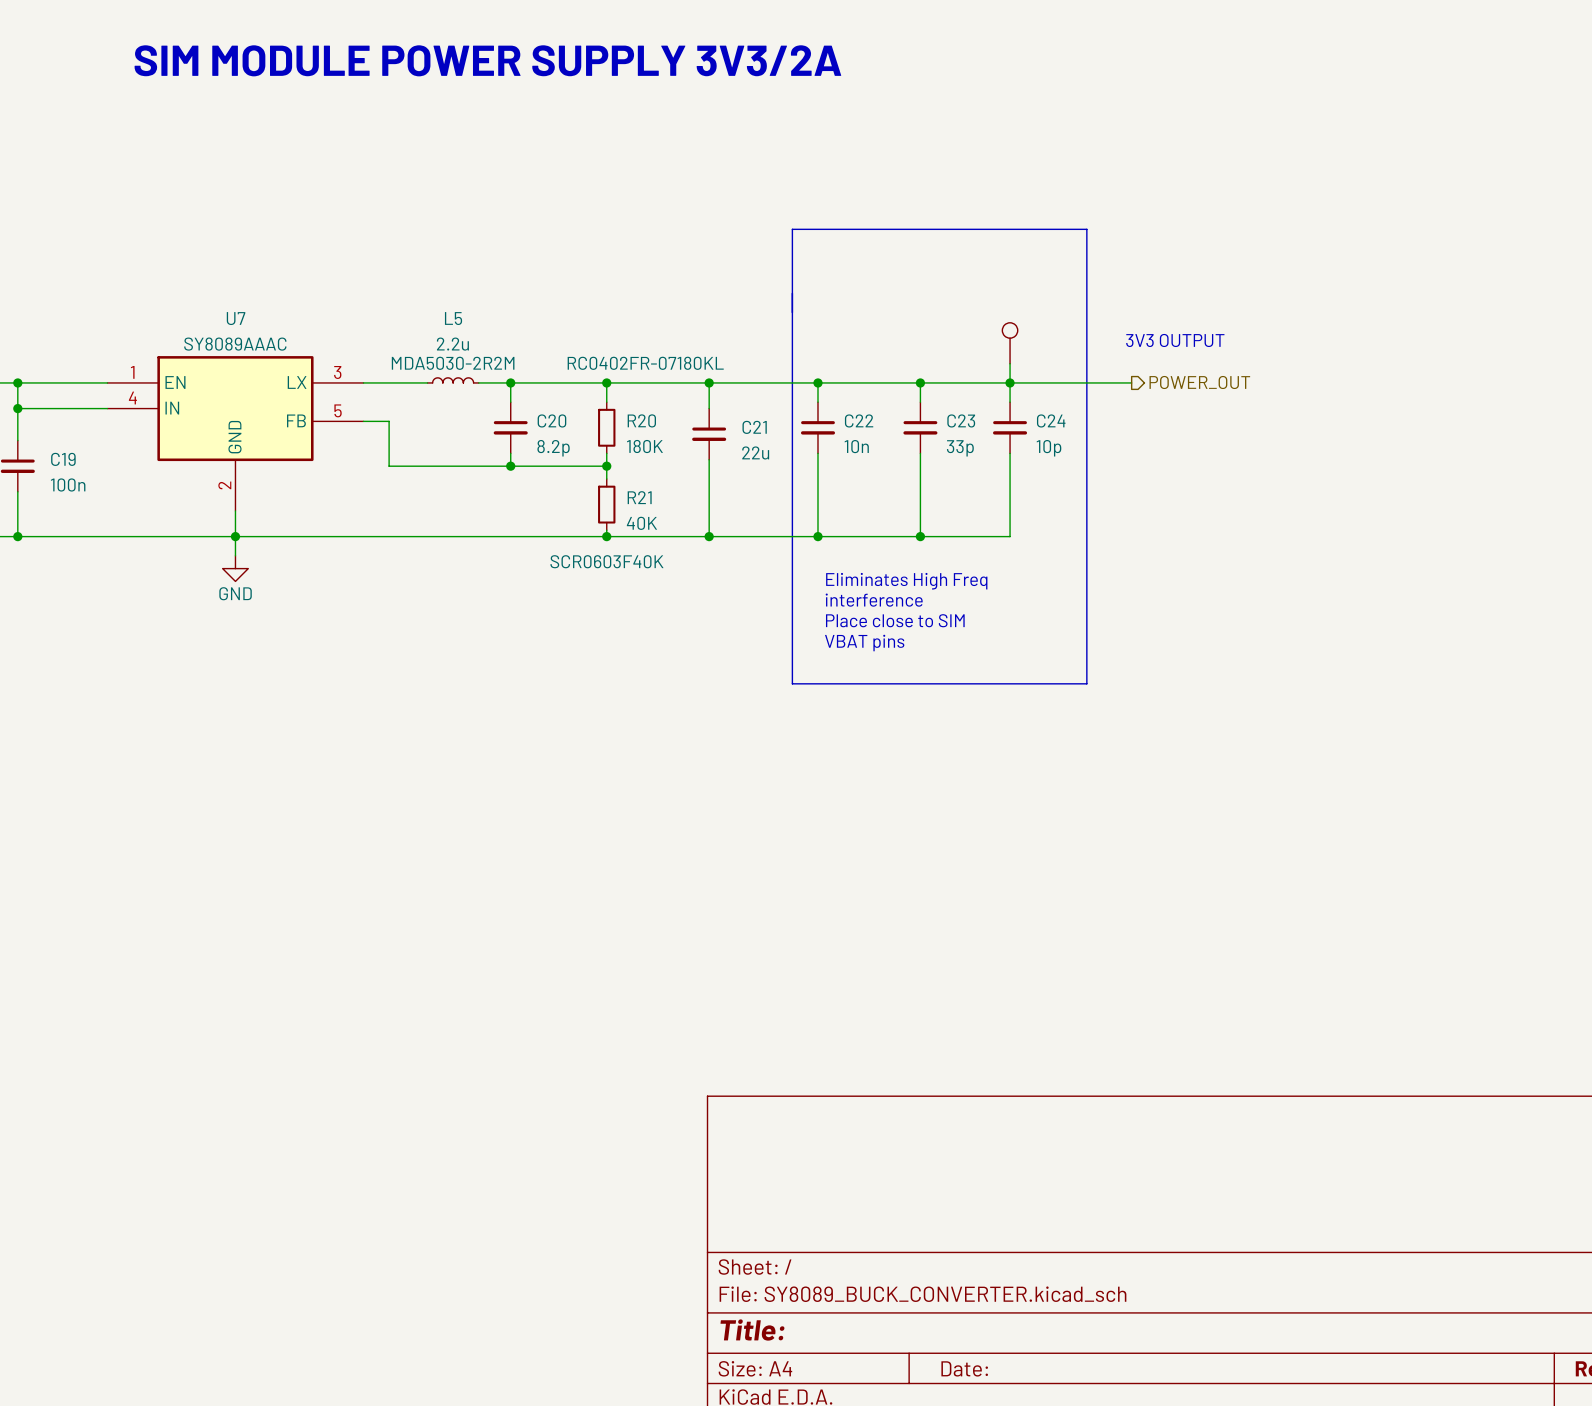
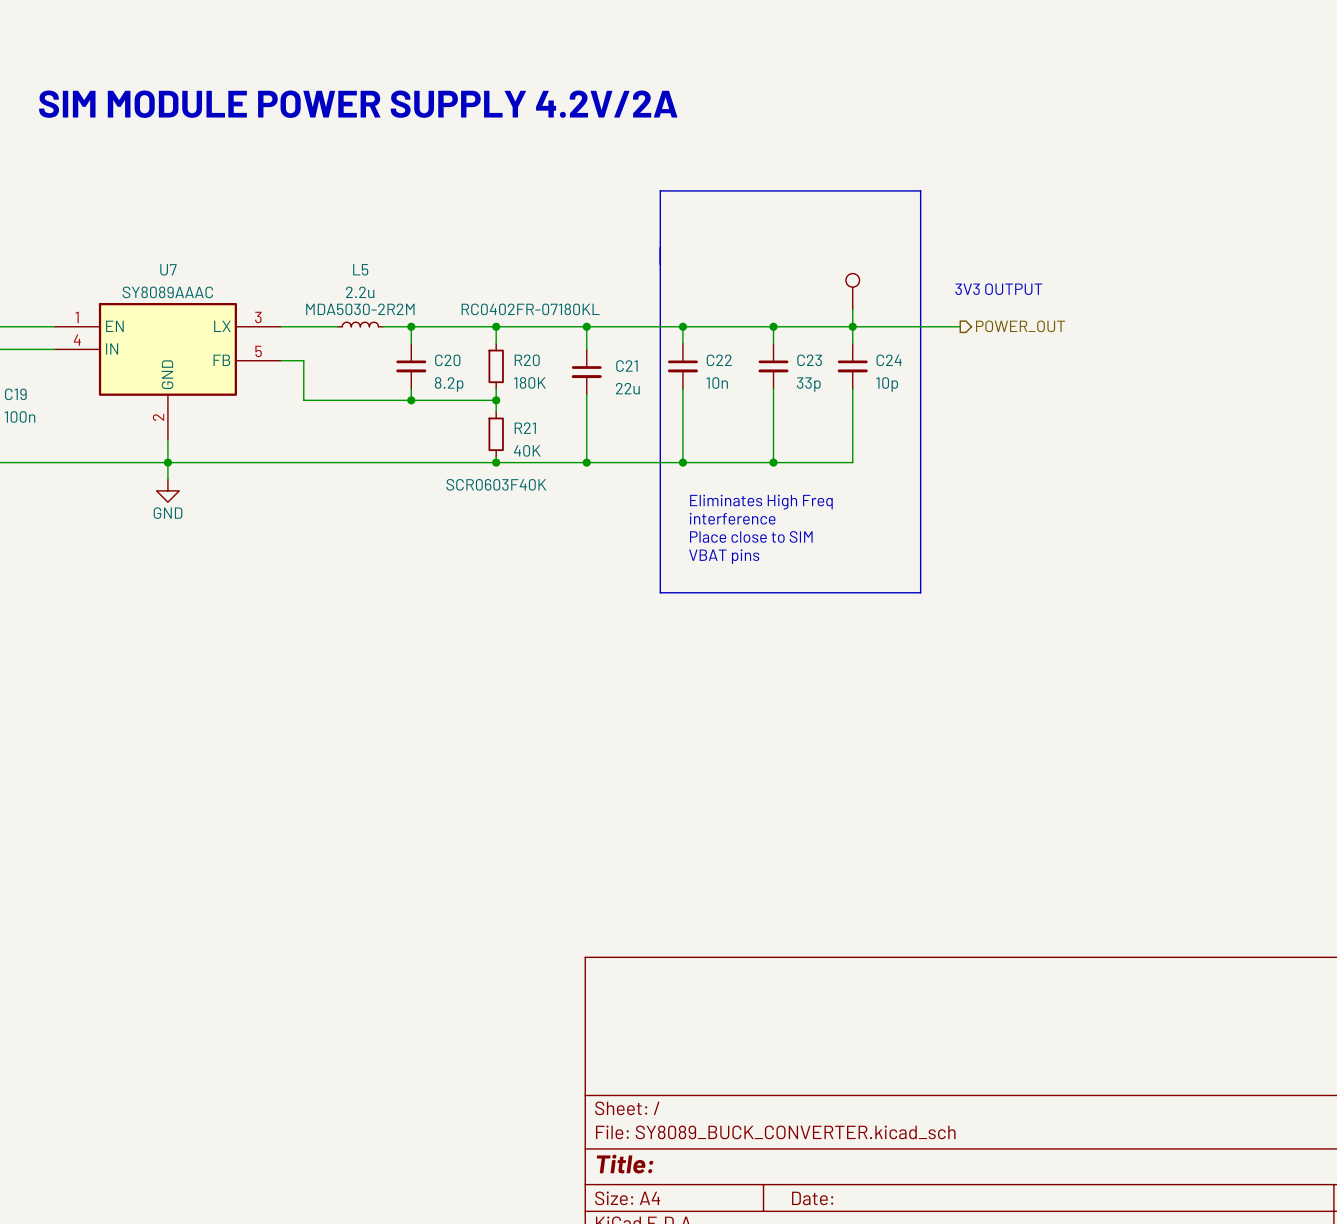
text: SIM MODULE POWER SUPPLY 3V3/2A (487, 60) -> none
text: none -> SIM MODULE POWER SUPPLY 4.2V/2A (358, 104)

